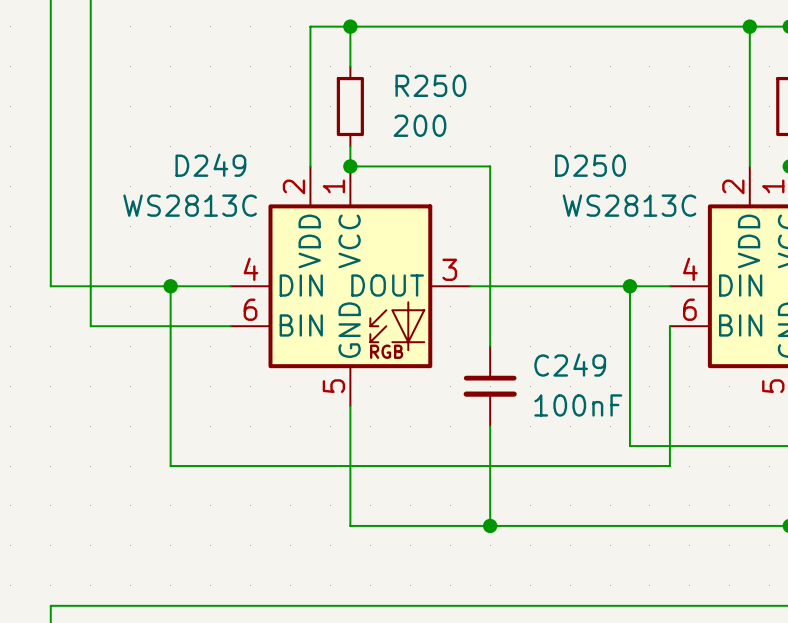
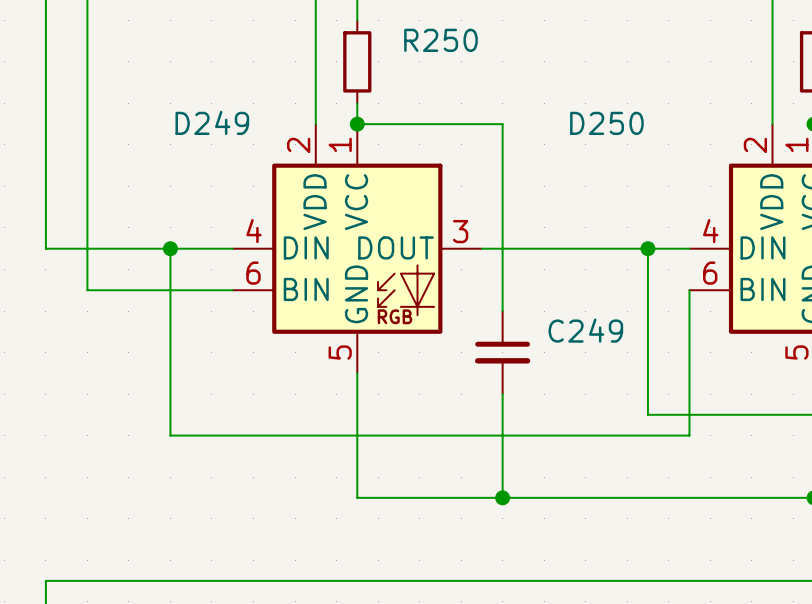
R250 value: 200 (419, 125) -> none
D249 value: WS2813C (190, 205) -> none
D250 value: WS2813C (629, 205) -> none
C249 value: 100nF (578, 405) -> none

